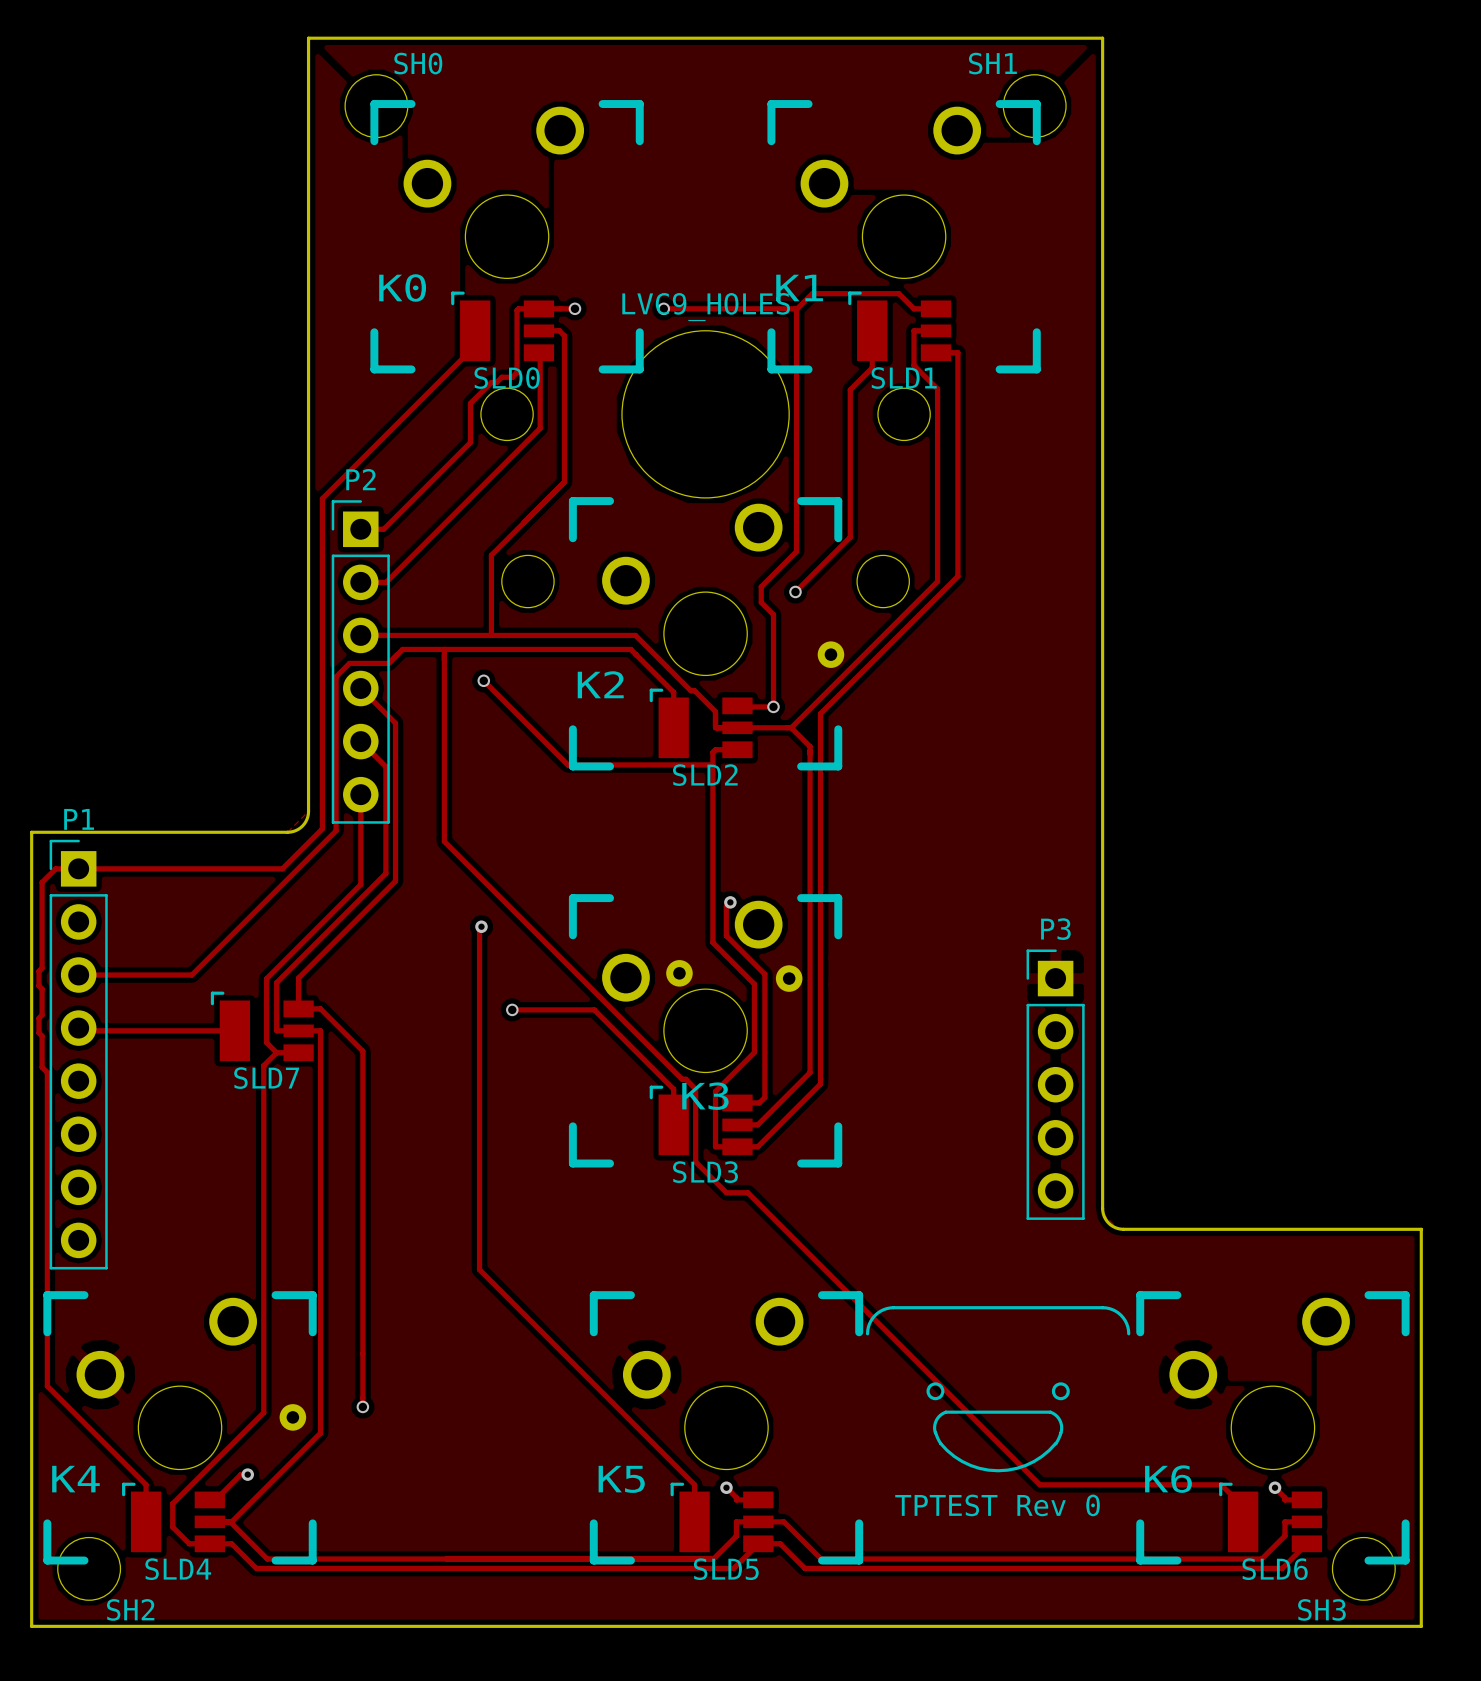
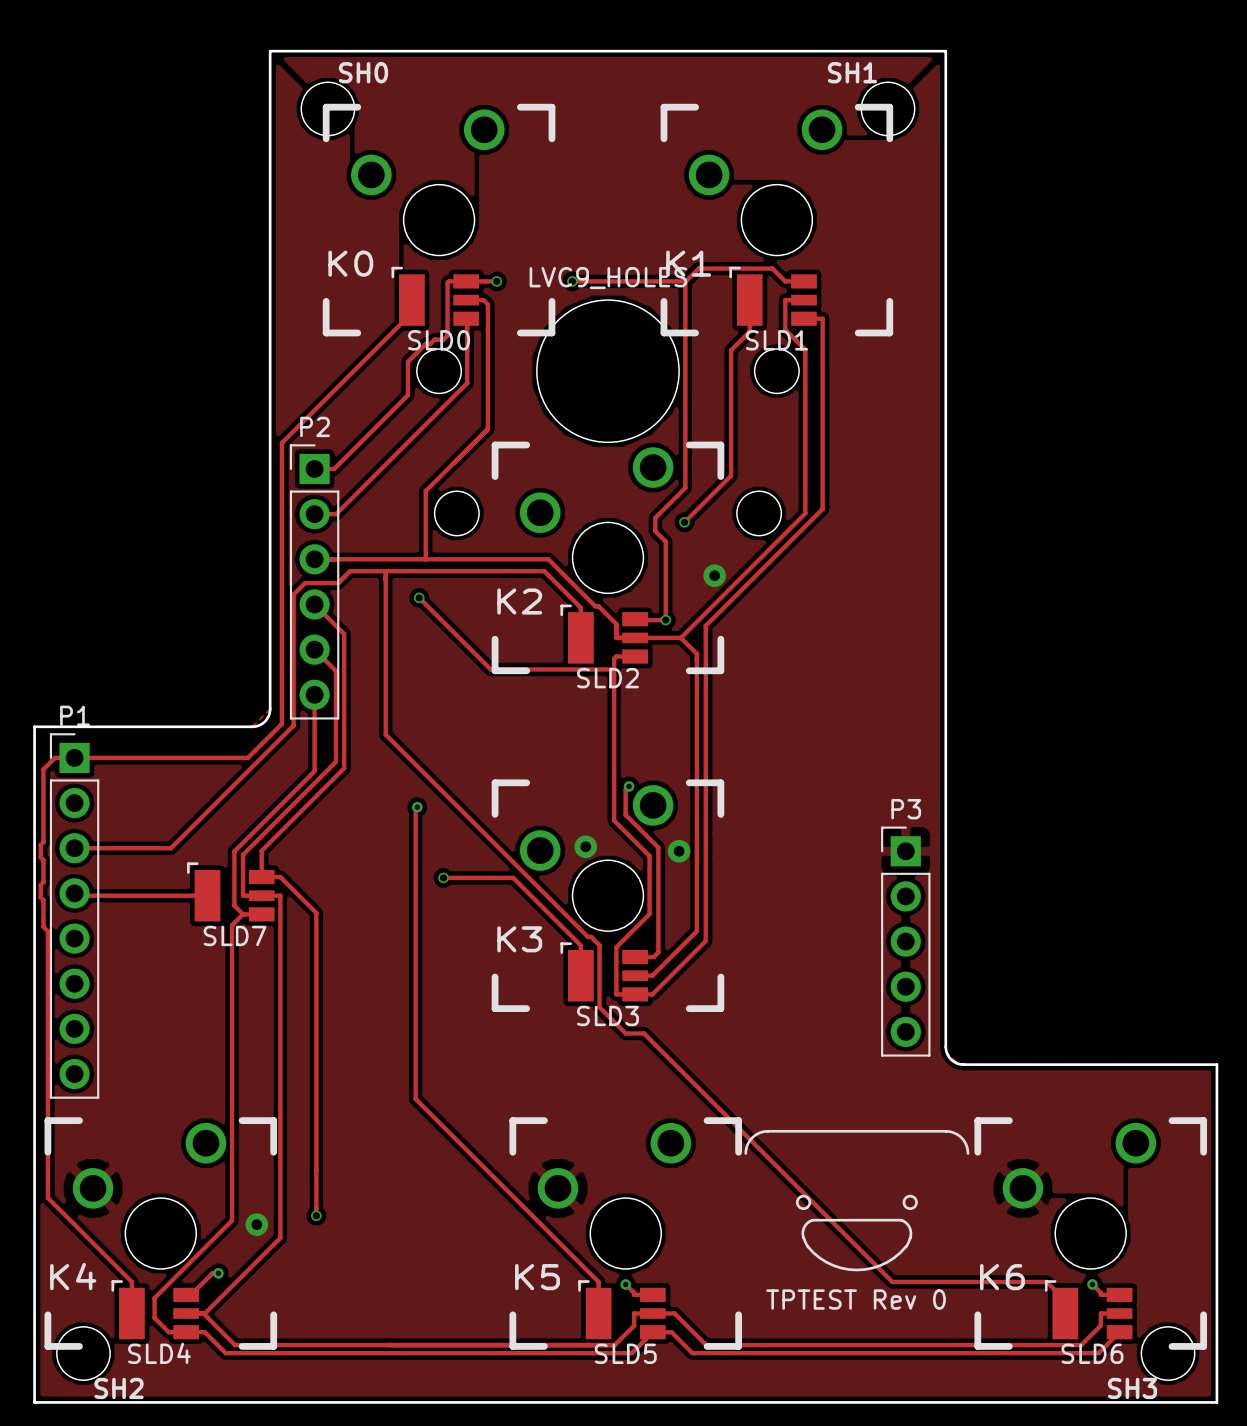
K3 name position: K3 (705, 1096) -> K3 (519, 939)

